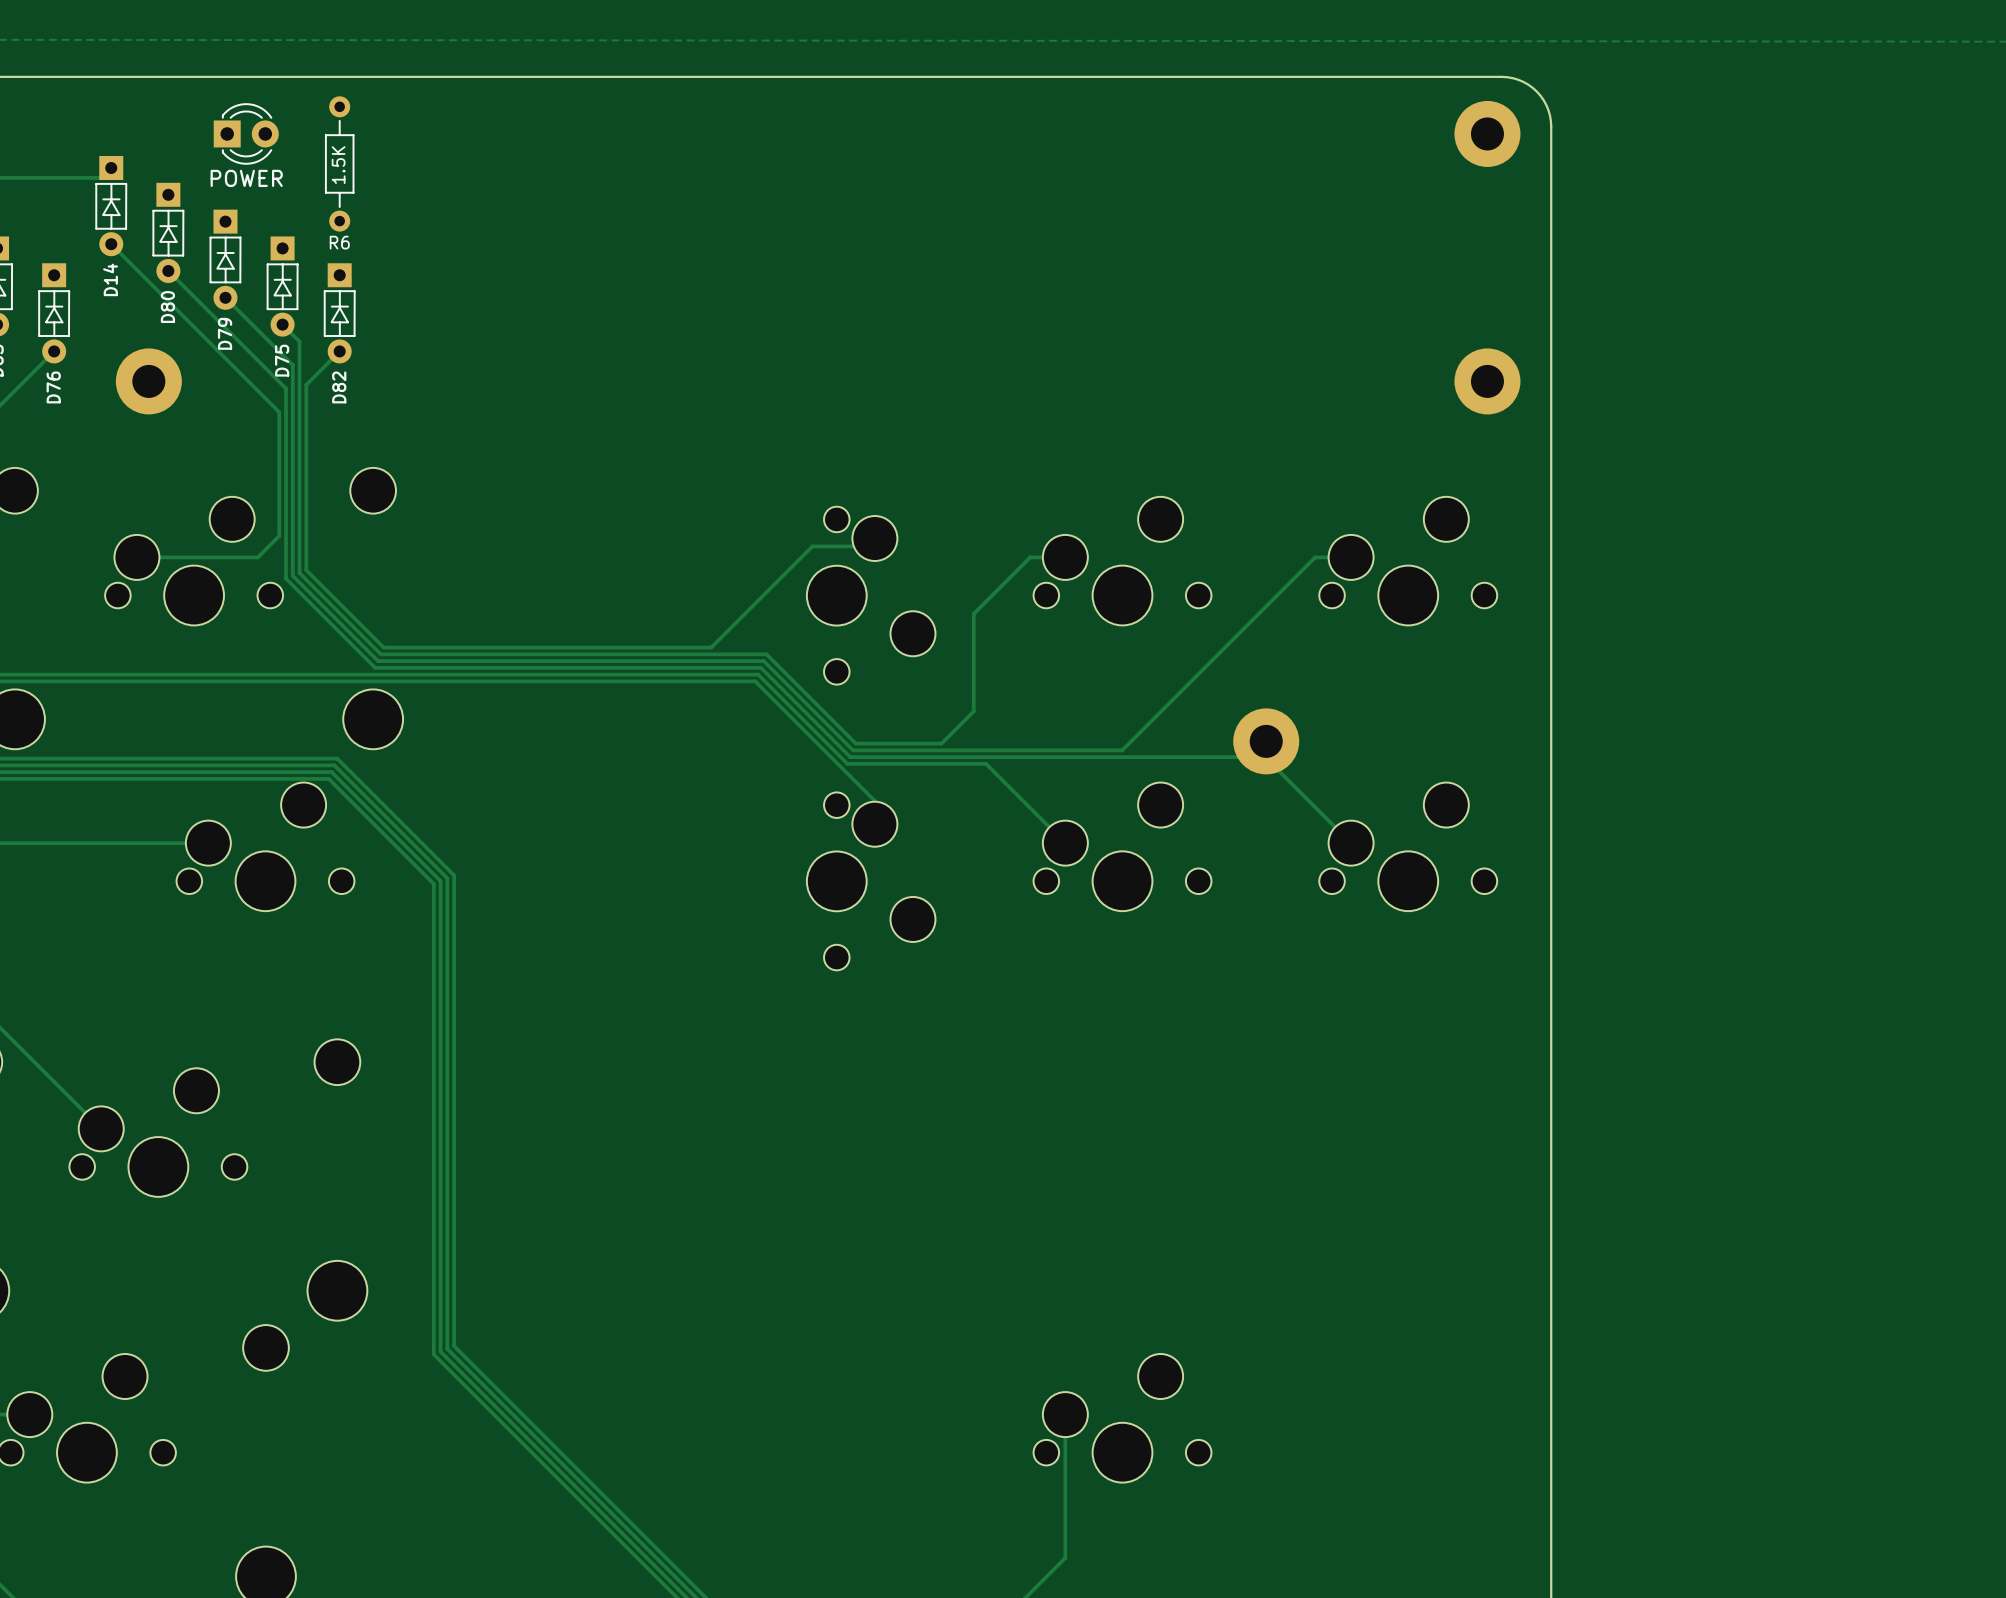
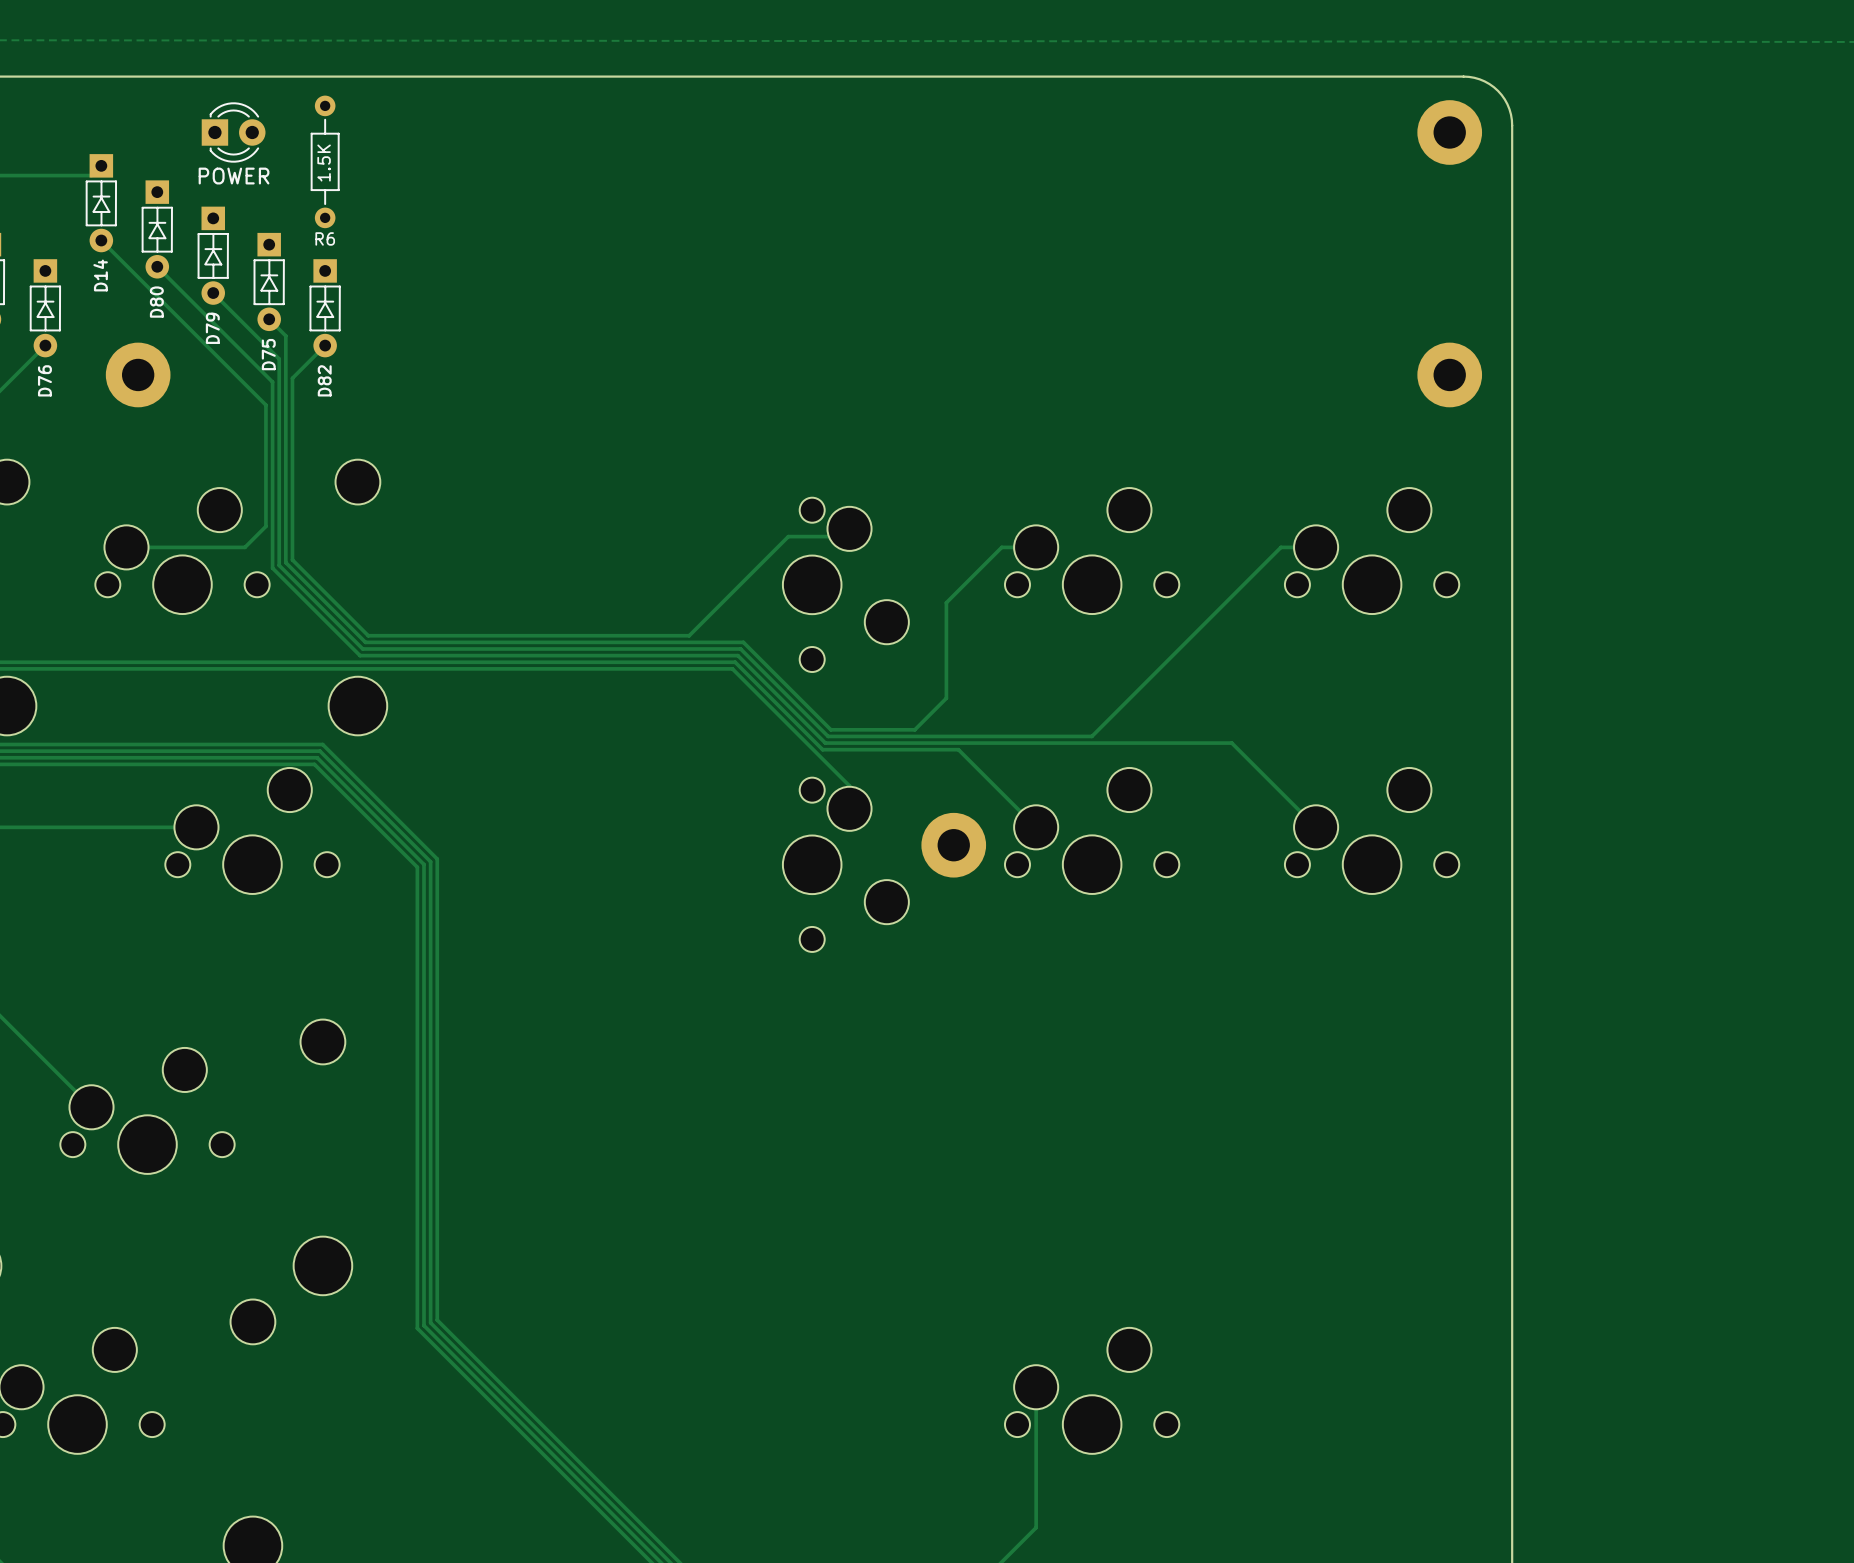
part position: (1266, 741) -> (953, 845)

